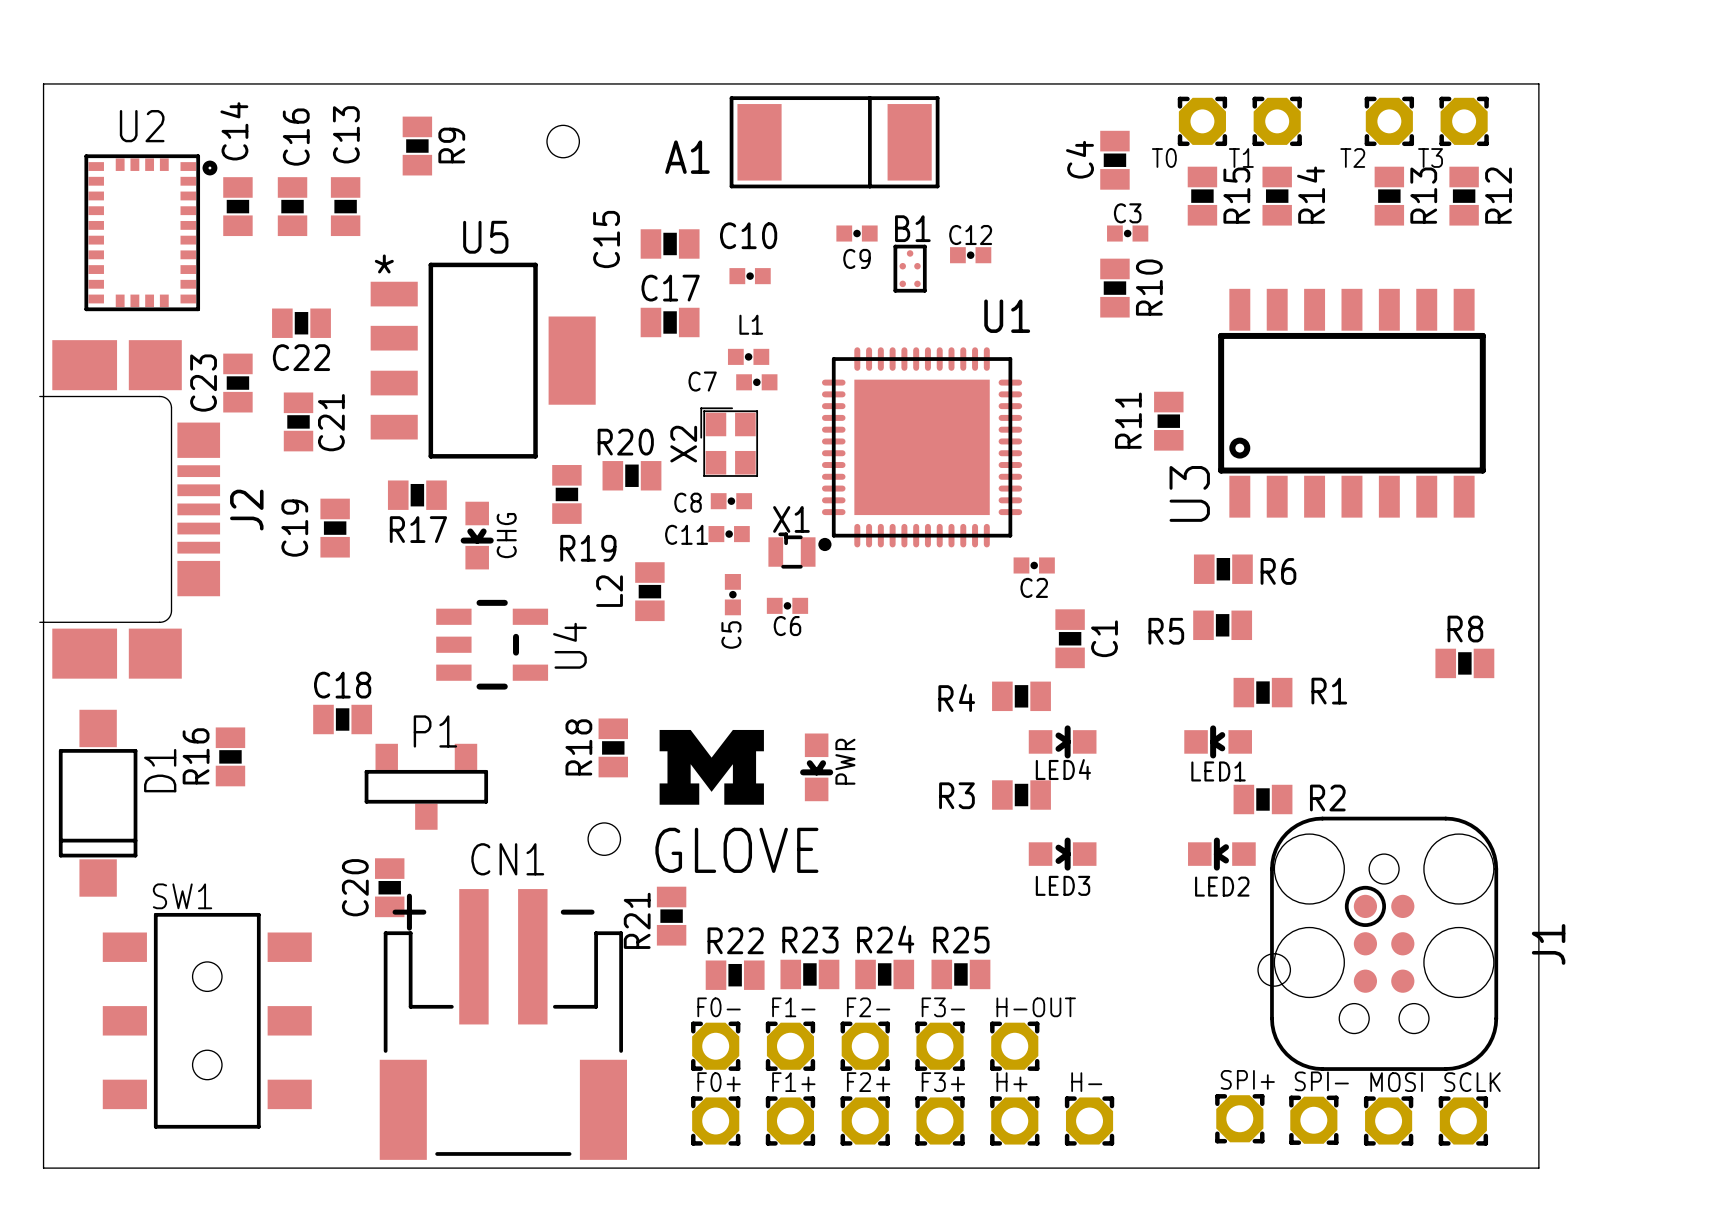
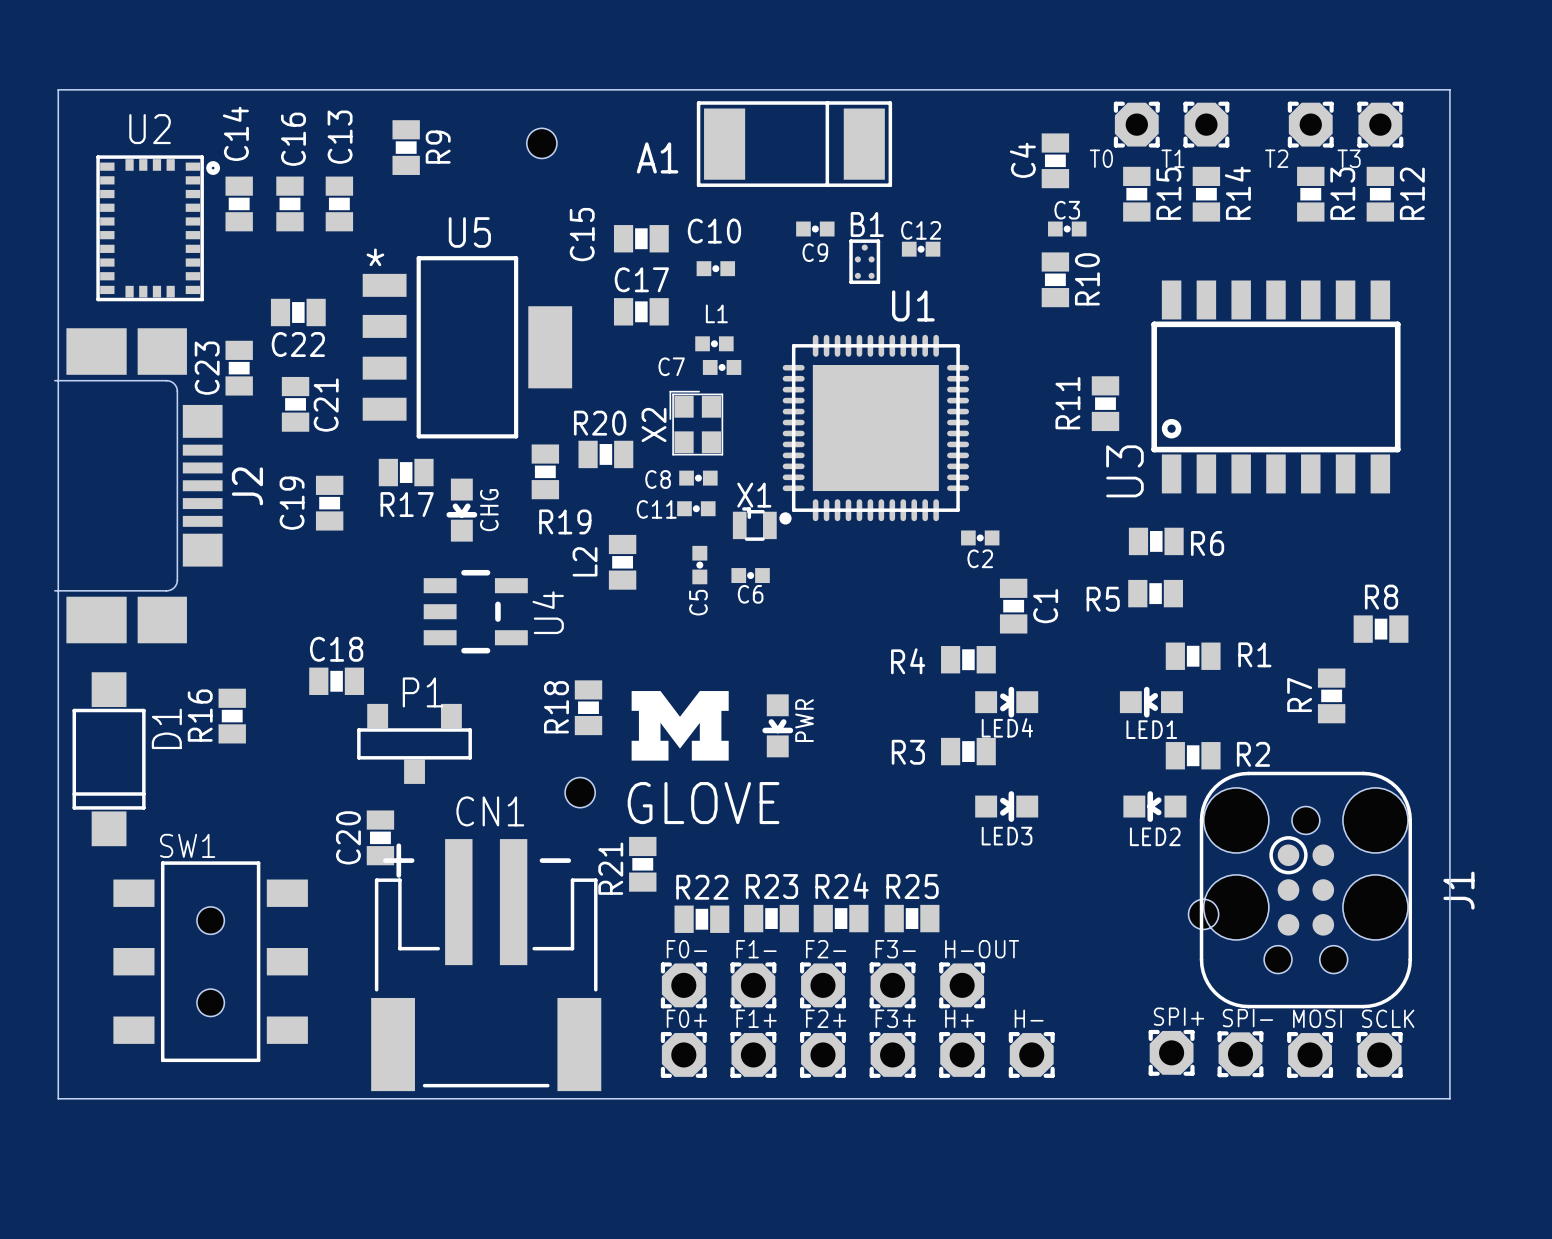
U1 name position: U1 (1007, 316) -> U1 (913, 305)
R7: none -> (1331, 695)

